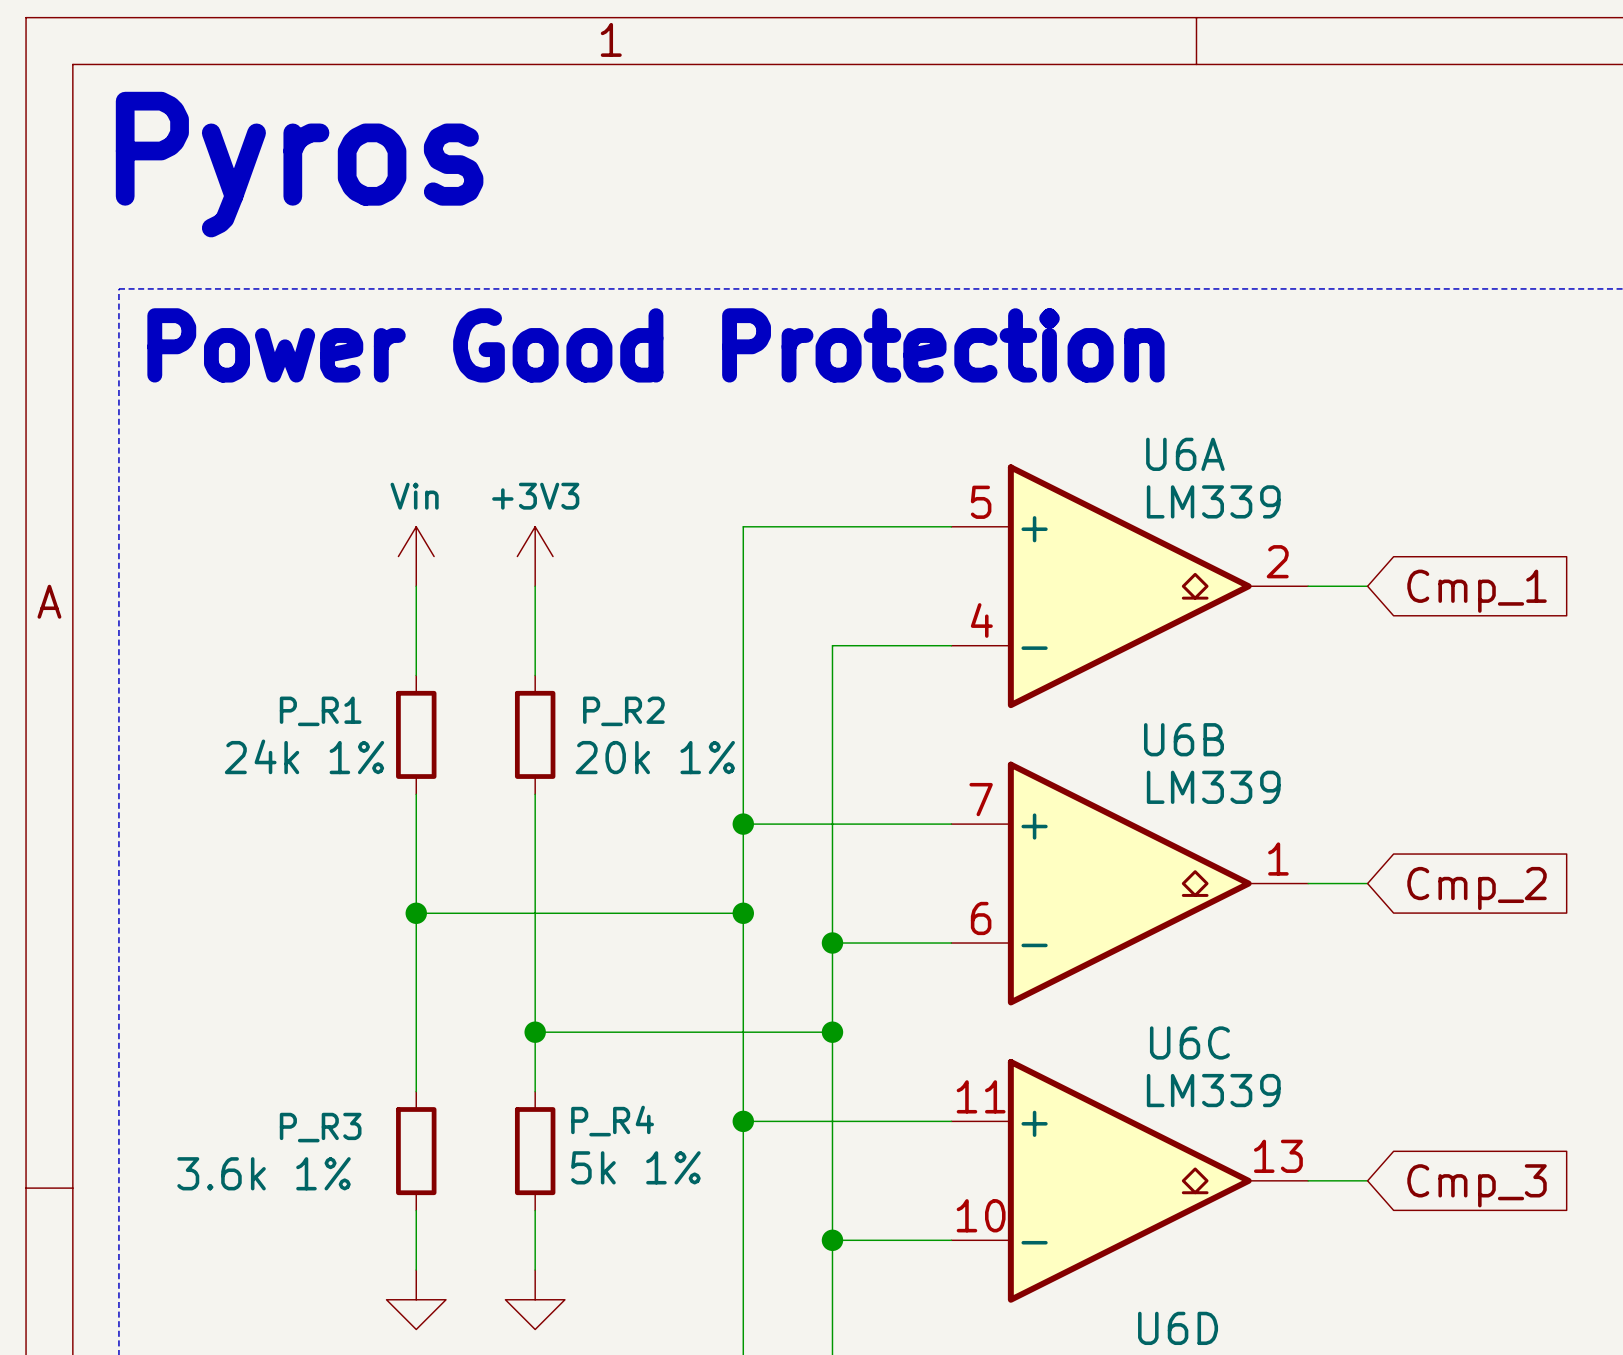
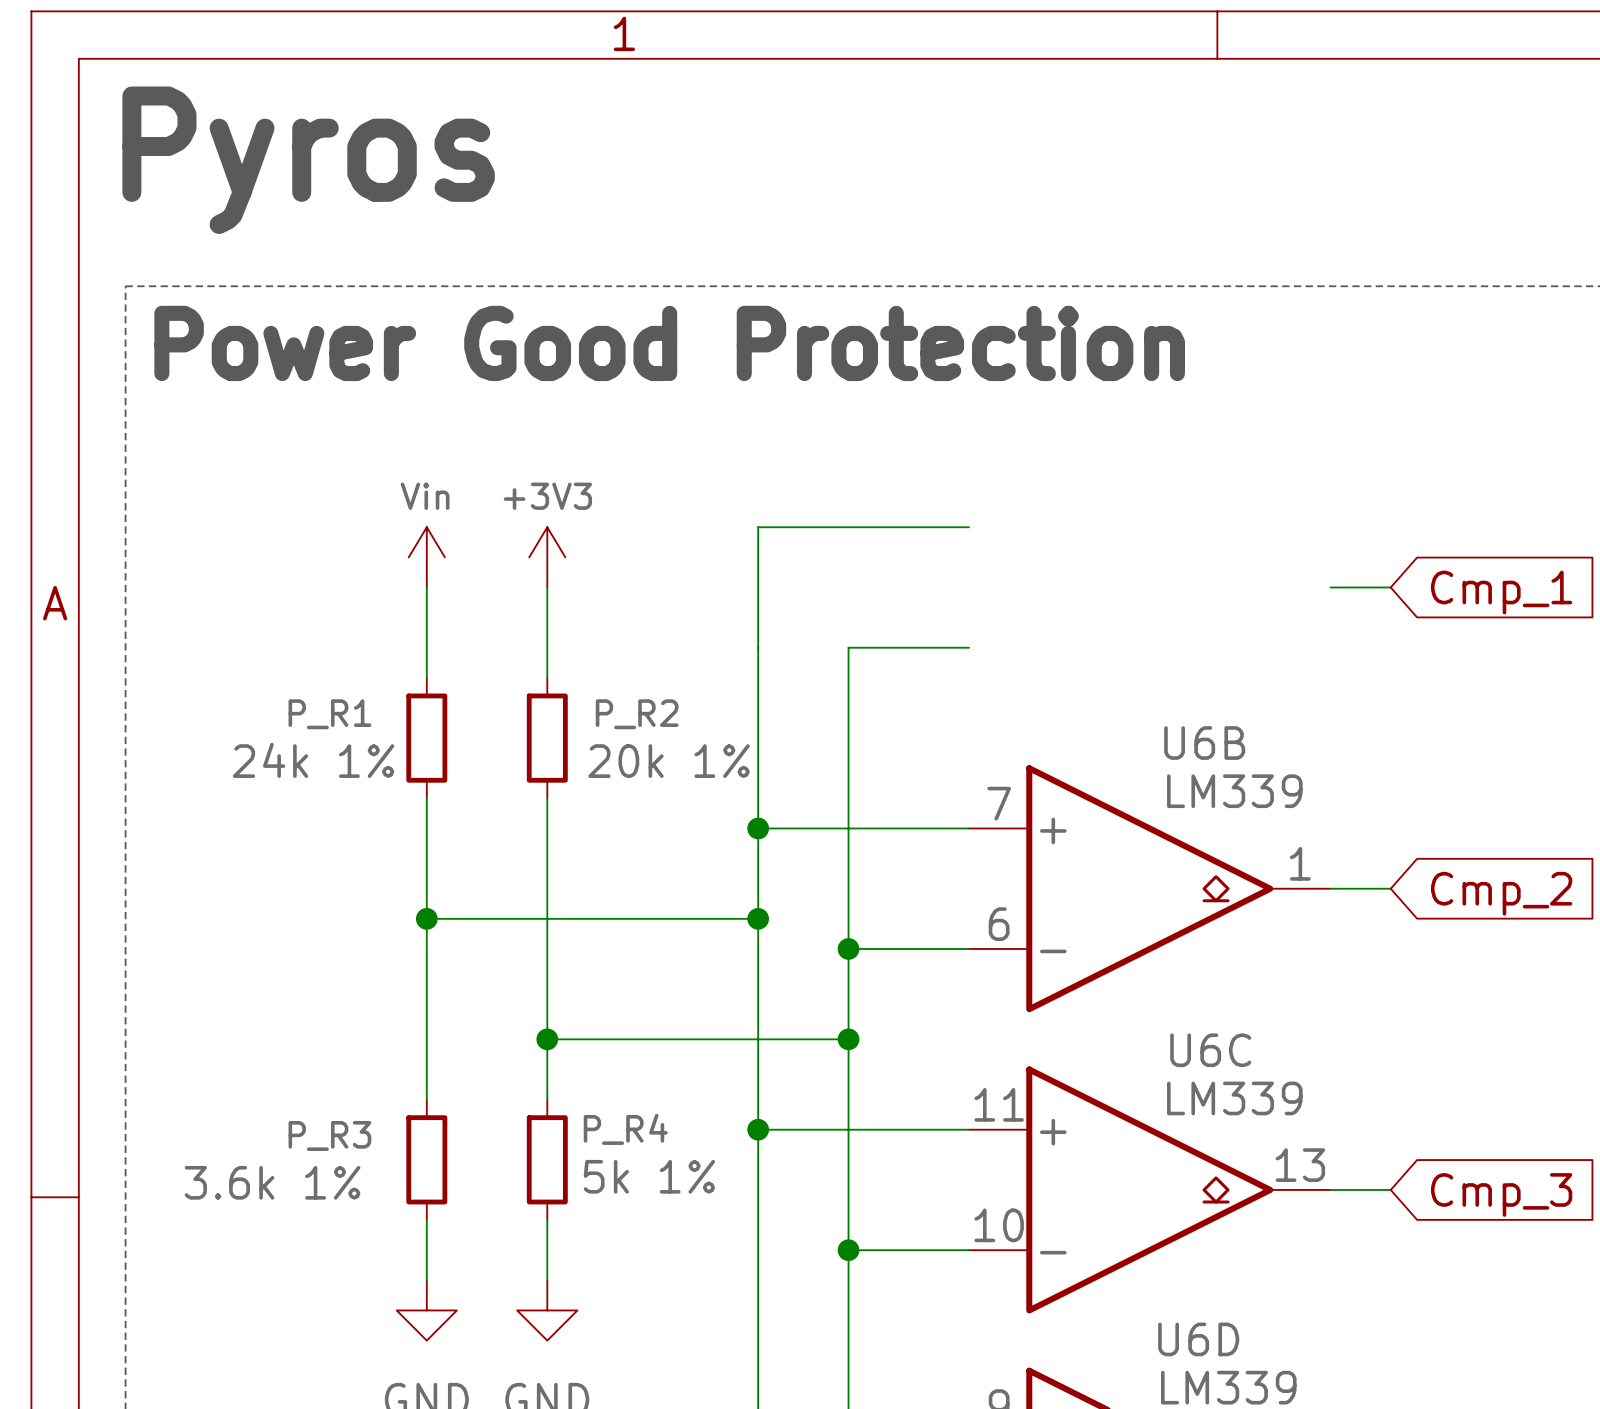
U6A: LM339 (1129, 586) -> none

